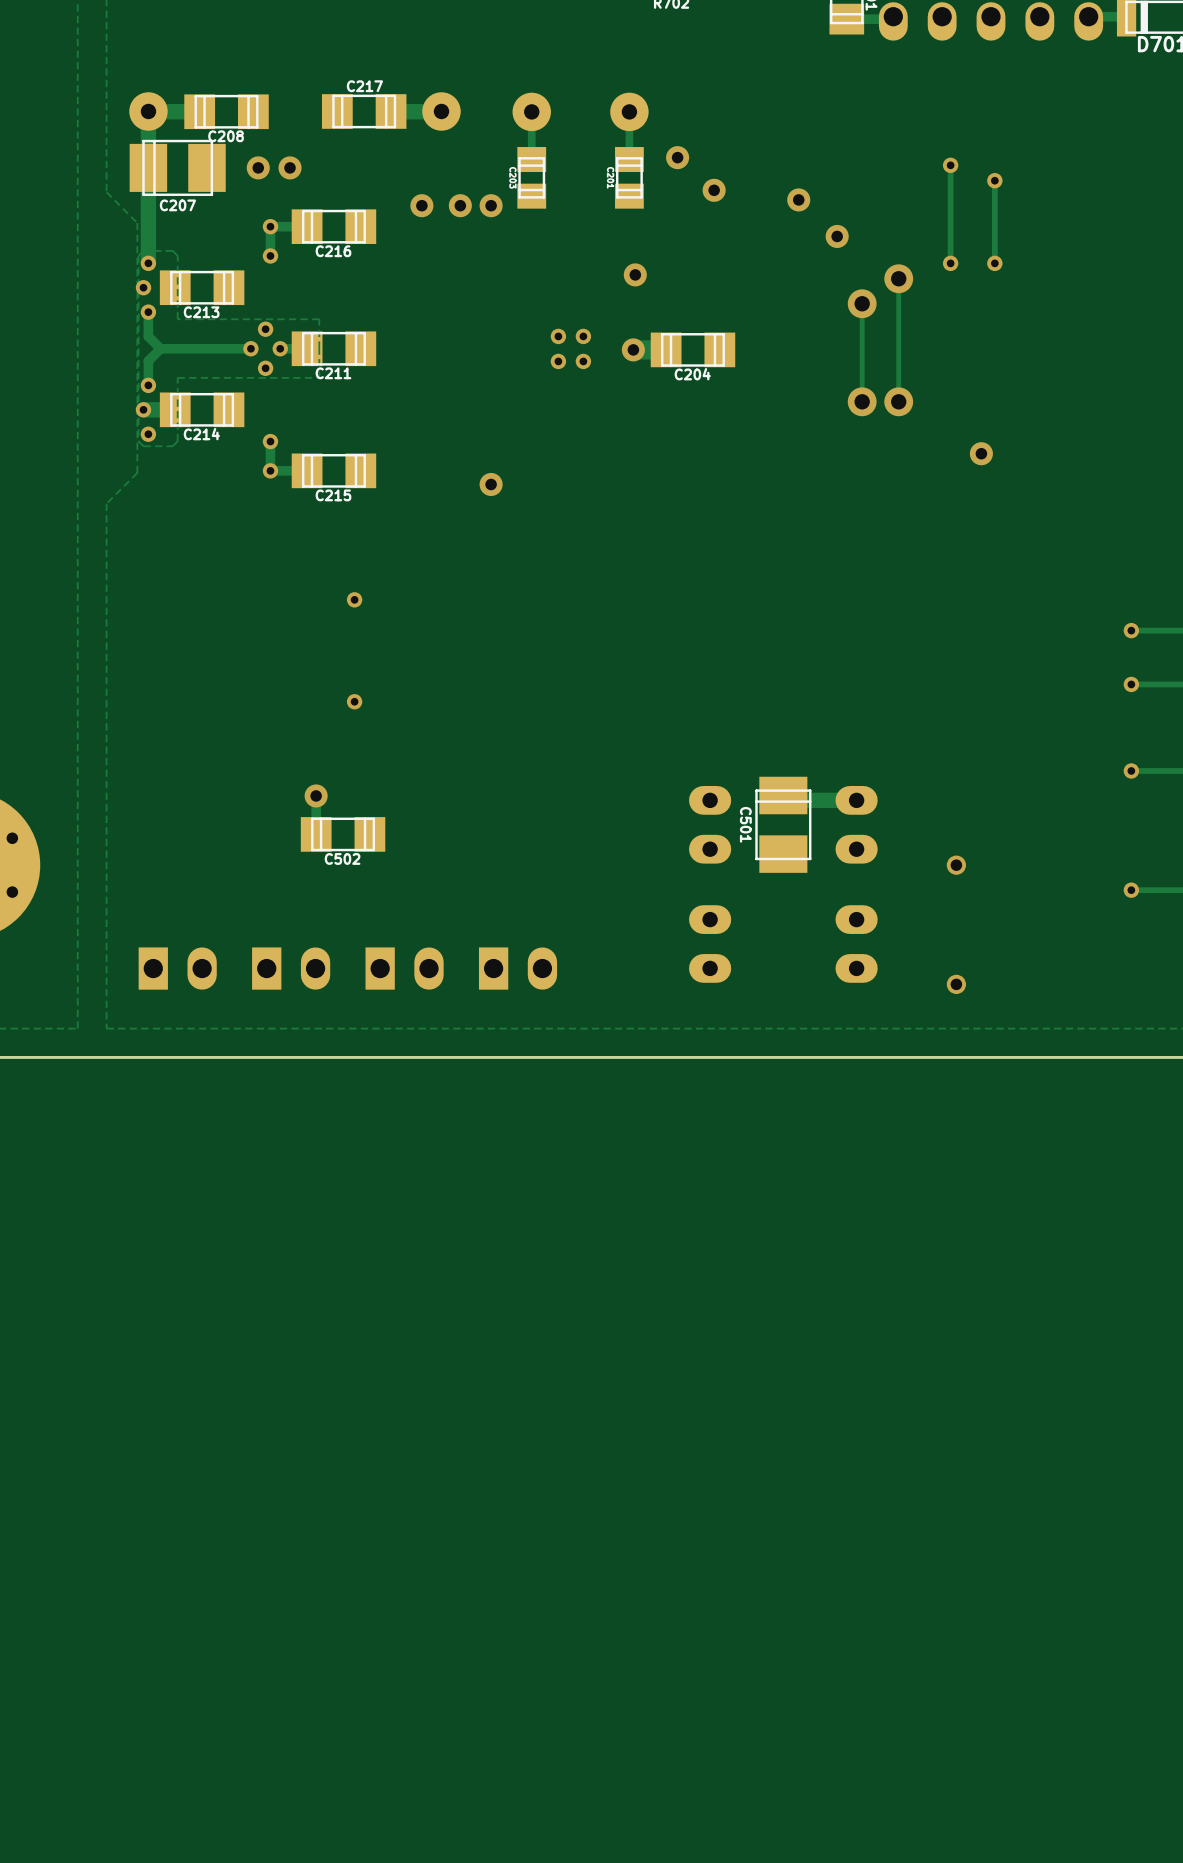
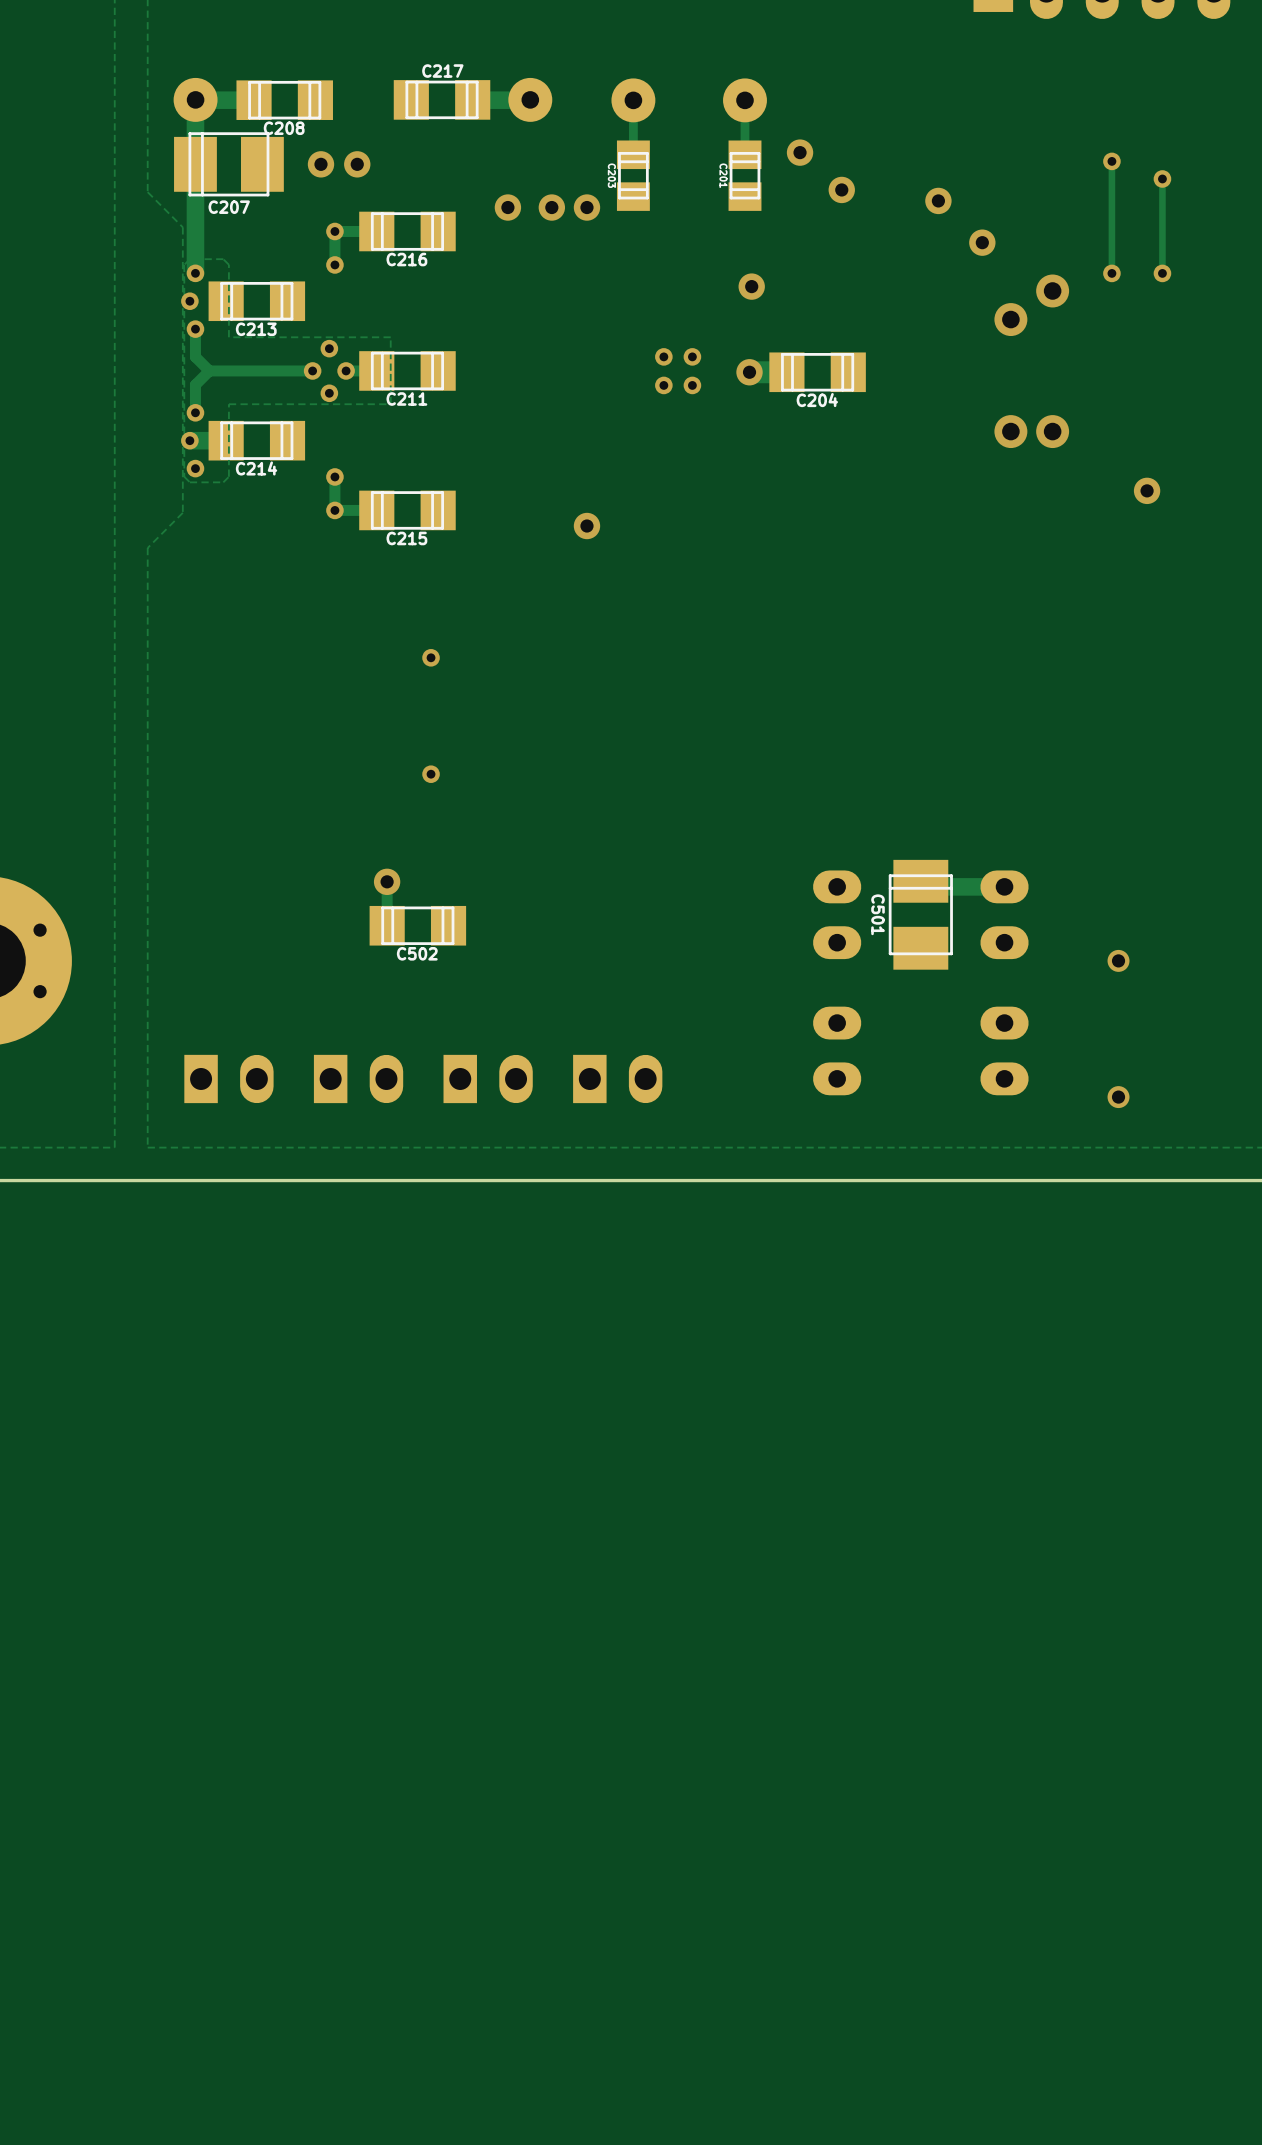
track: (898, 278) (898, 401) -> none
track: (862, 303) (862, 401) -> none

